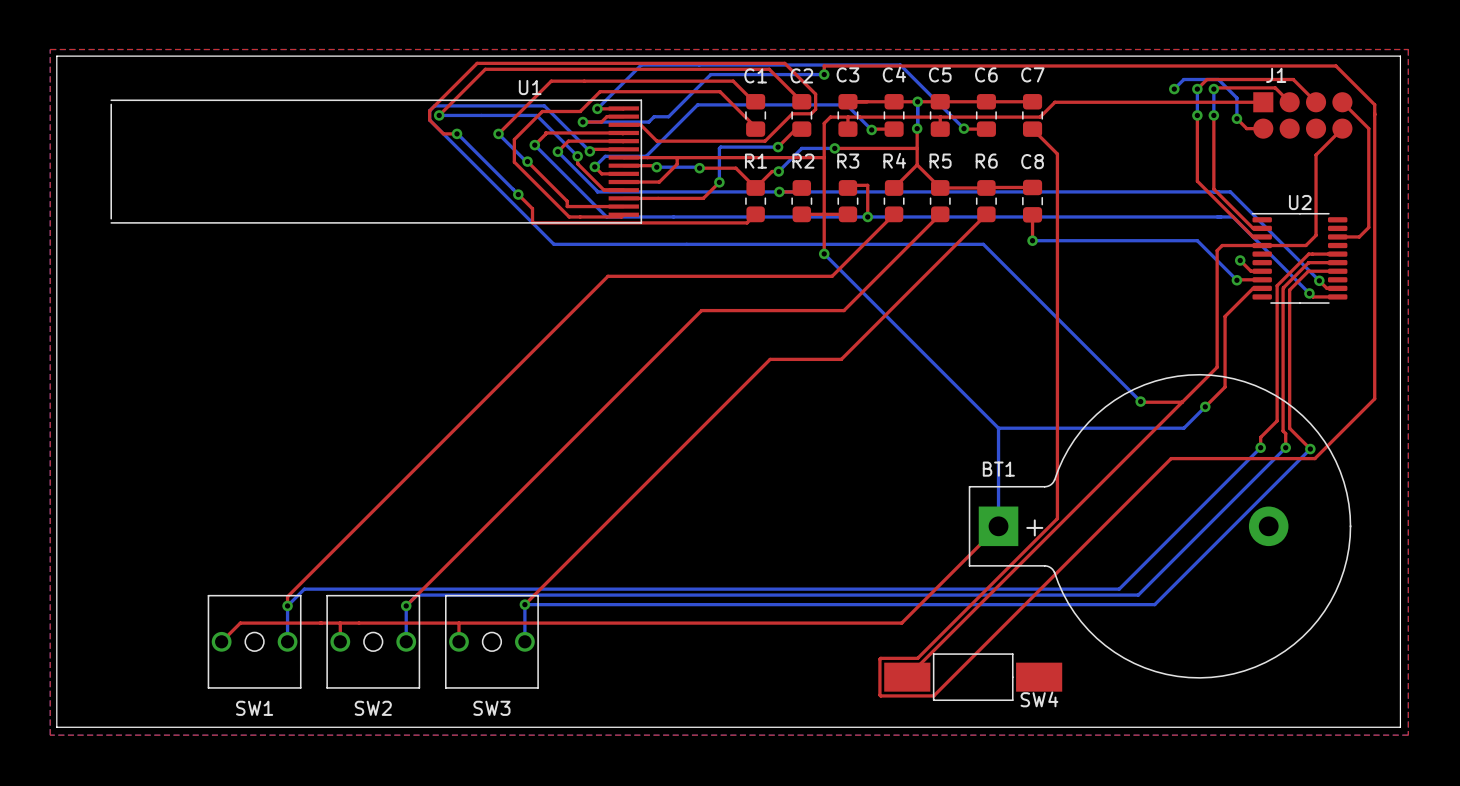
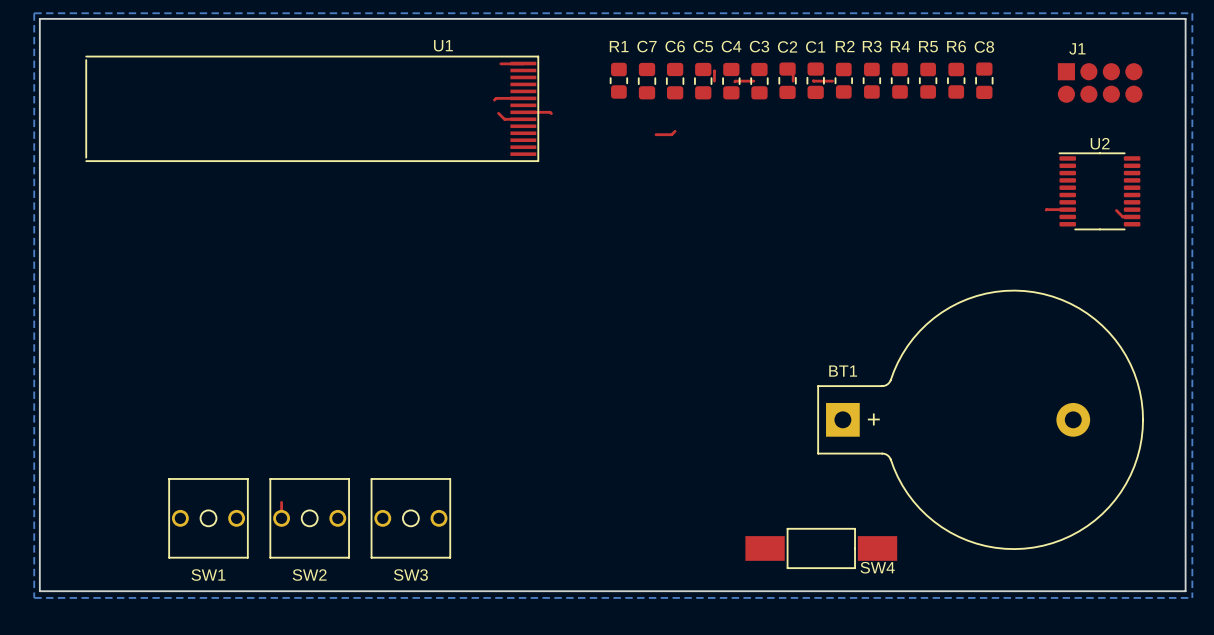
top zone outline: (50, 49) (50, 735) (1408, 735) (1408, 49) (50, 49) -> none
top track: (824, 74) (824, 66) (1335, 66) (1374, 104) (1374, 398) (1314, 458) (1171, 458) (933, 695) (880, 695) (879, 659) (917, 658) (1057, 518) (1057, 154) (1032, 129) -> none
bottom track: (824, 74) (710, 74) (668, 116) (654, 116) (648, 122) (582, 122) -> none
via: (824, 74) -> none
bottom track: (1174, 89) (1183, 79) (1218, 79) (1236, 98) (1236, 118) -> none
via: (1174, 89) -> none
top track: (1197, 89) (1206, 79) (1293, 79) (1316, 102) -> none
bottom track: (1197, 89) (1197, 115) -> none
via: (1197, 89) -> none
top track: (1213, 89) (1275, 87) (1289, 102) -> none
bottom track: (1213, 89) (1213, 115) -> none
via: (1213, 89) -> none
top track: (801, 98) (801, 101) (769, 69) (485, 69) (439, 115) -> none
top track: (755, 101) (733, 81) (551, 81) (498, 133) -> none
top track: (847, 101) (1032, 101) -> none
bottom track: (917, 101) (917, 128) -> none
via: (917, 101) -> none
top track: (1263, 102) (1054, 102) (1040, 117) (830, 117) (824, 123) (824, 253) -> none
top track: (1342, 102) (1368, 128) (1368, 227) (1359, 236) (1337, 236) -> none
bottom track: (597, 108) (641, 65) (900, 65) (963, 128) -> none
via: (597, 108) -> none
bottom track: (439, 115) (536, 115) (577, 156) -> none
via: (439, 115) -> none
C1 position: (755, 115) -> (815, 80)
C2 position: (801, 115) -> (787, 80)
C3 position: (847, 115) -> (759, 81)
C4 position: (894, 115) -> (731, 81)
C5 position: (940, 115) -> (703, 81)
C6 position: (986, 115) -> (675, 81)
C7 position: (1032, 115) -> (647, 81)
top track: (1197, 115) (1197, 181) (1253, 236) (1262, 236) -> none
via: (1197, 115) -> none
top track: (1213, 115) (1213, 189) (1253, 228) (1262, 228) -> none
via: (1213, 115) -> none
J1 position: (1302, 115) -> (1100, 82)
top track: (623, 116) (606, 116) (601, 122) (582, 122) -> none
top track: (1236, 118) (1246, 128) (1263, 128) -> none
via: (1236, 118) -> none
via: (582, 122) -> none
top track: (623, 124) (640, 124) (656, 141) (765, 141) (792, 113) (811, 113) (815, 109) (815, 94) (784, 63) (477, 63) (429, 110) (429, 120) (443, 133) (457, 133) -> none
top track: (917, 128) (917, 164) -> none
via: (917, 128) -> none
via: (963, 128) -> none
top track: (1342, 128) (1316, 155) (1316, 235) (1305, 245) (1222, 245) (1217, 250) (1217, 367) (907, 677) -> none
top track: (755, 129) (720, 91) (600, 91) (580, 111) (542, 111) (514, 139) (514, 162) (569, 216) (621, 216) (623, 214) -> none
top track: (801, 129) (796, 129) (778, 147) -> none
bottom track: (871, 129) (846, 104) (697, 104) (646, 156) (605, 156) (594, 166) -> none
via: (871, 129) -> none
bottom track: (457, 133) (518, 194) -> none
via: (457, 133) -> none
bottom track: (498, 133) (527, 161) -> none
via: (498, 133) -> none
top track: (622, 133) (545, 132) (534, 145) -> none
top track: (623, 141) (568, 141) (557, 151) -> none
bottom track: (534, 145) (606, 216) (1232, 216) (1309, 293) -> none
via: (534, 145) -> none
bottom track: (778, 147) (720, 147) (719, 182) -> none
via: (778, 147) -> none
top track: (834, 148) (917, 148) -> none
bottom track: (834, 148) (801, 148) (778, 171) -> none
via: (834, 148) -> none
bottom track: (557, 151) (597, 191) (1230, 191) (1319, 280) -> none
via: (557, 151) -> none
bottom track: (589, 151) (544, 105) (434, 105) (429, 110) (429, 120) (553, 244) (983, 244) (1140, 401) -> none
via: (589, 151) -> none
top track: (577, 156) (577, 163) (604, 190) (623, 190) -> none
via: (577, 156) -> none
top track: (623, 157) (824, 157) -> none
top track: (677, 157) (677, 164) (659, 182) (623, 182) -> none
top track: (527, 161) (567, 201) (567, 206) (623, 206) -> none
via: (527, 161) -> none
top track: (917, 164) (894, 187) -> none
top track: (917, 164) (940, 187) (1032, 187) -> none
via: (594, 166) -> none
bottom track: (656, 167) (699, 168) -> none
via: (656, 167) -> none
top track: (699, 168) (735, 168) (755, 187) (772, 171) (778, 171) -> none
via: (699, 168) -> none
via: (778, 171) -> none
top track: (719, 182) (703, 198) (623, 198) -> none
via: (719, 182) -> none
top track: (847, 187) (850, 185) (867, 185) (867, 216) -> none
via: (779, 191) -> none
top track: (518, 194) (532, 208) (532, 222) (747, 222) (755, 214) -> none
via: (518, 194) -> none
R1 position: (755, 201) -> (618, 80)
R2 position: (801, 201) -> (843, 80)
R3 position: (847, 201) -> (871, 80)
R4 position: (894, 201) -> (900, 80)
R5 position: (940, 201) -> (928, 80)
R6 position: (986, 201) -> (956, 80)
C8 position: (1032, 201) -> (984, 80)
top track: (801, 214) (847, 214) -> none
top track: (894, 214) (832, 276) (607, 276) (287, 596) (287, 605) -> none
top track: (940, 214) (843, 310) (701, 310) (406, 605) -> none
top track: (986, 214) (841, 359) (770, 359) (524, 604) -> none
top track: (1032, 214) (1032, 240) -> none
via: (867, 216) -> none
bottom track: (1032, 240) (1197, 240) (1236, 280) -> none
via: (1032, 240) -> none
bottom track: (824, 253) (998, 428) -> none
via: (824, 253) -> none
top track: (1337, 254) (1308, 254) (1277, 285) (1277, 420) (1260, 437) (1260, 447) -> none
top track: (1240, 260) (1250, 271) (1262, 271) -> none
via: (1240, 260) -> none
top track: (1337, 262) (1308, 262) (1283, 288) -> none
top track: (1337, 271) (1308, 271) (1289, 289) (1289, 428) (1310, 449) -> none
via: (1236, 280) -> none
via: (1319, 280) -> none
top track: (1262, 288) (1253, 288) (1225, 316) (1225, 387) (1205, 406) -> none
top track: (1283, 288) (1283, 430) (1285, 433) (1285, 447) -> none
top track: (1309, 293) (1312, 296) (1337, 296) -> none
via: (1309, 293) -> none
top track: (1140, 401) (1182, 402) -> none
via: (1140, 401) -> none
bottom track: (1205, 406) (1183, 428) (998, 428) -> none
via: (1205, 406) -> none
bottom track: (998, 428) (998, 526) -> none
bottom track: (1260, 447) (1119, 589) (304, 589) (287, 605) (287, 641) -> none
via: (1260, 447) -> none
bottom track: (1285, 447) (1138, 595) (417, 595) (406, 605) (406, 641) -> none
via: (1285, 447) -> none
bottom track: (1310, 449) (1154, 604) (524, 604) (524, 641) -> none
via: (1310, 449) -> none
top track: (998, 526) (901, 623) (240, 623) (221, 641) -> none
via: (524, 604) -> none
via: (287, 605) -> none
via: (406, 605) -> none
top track: (458, 623) (458, 641) -> none

